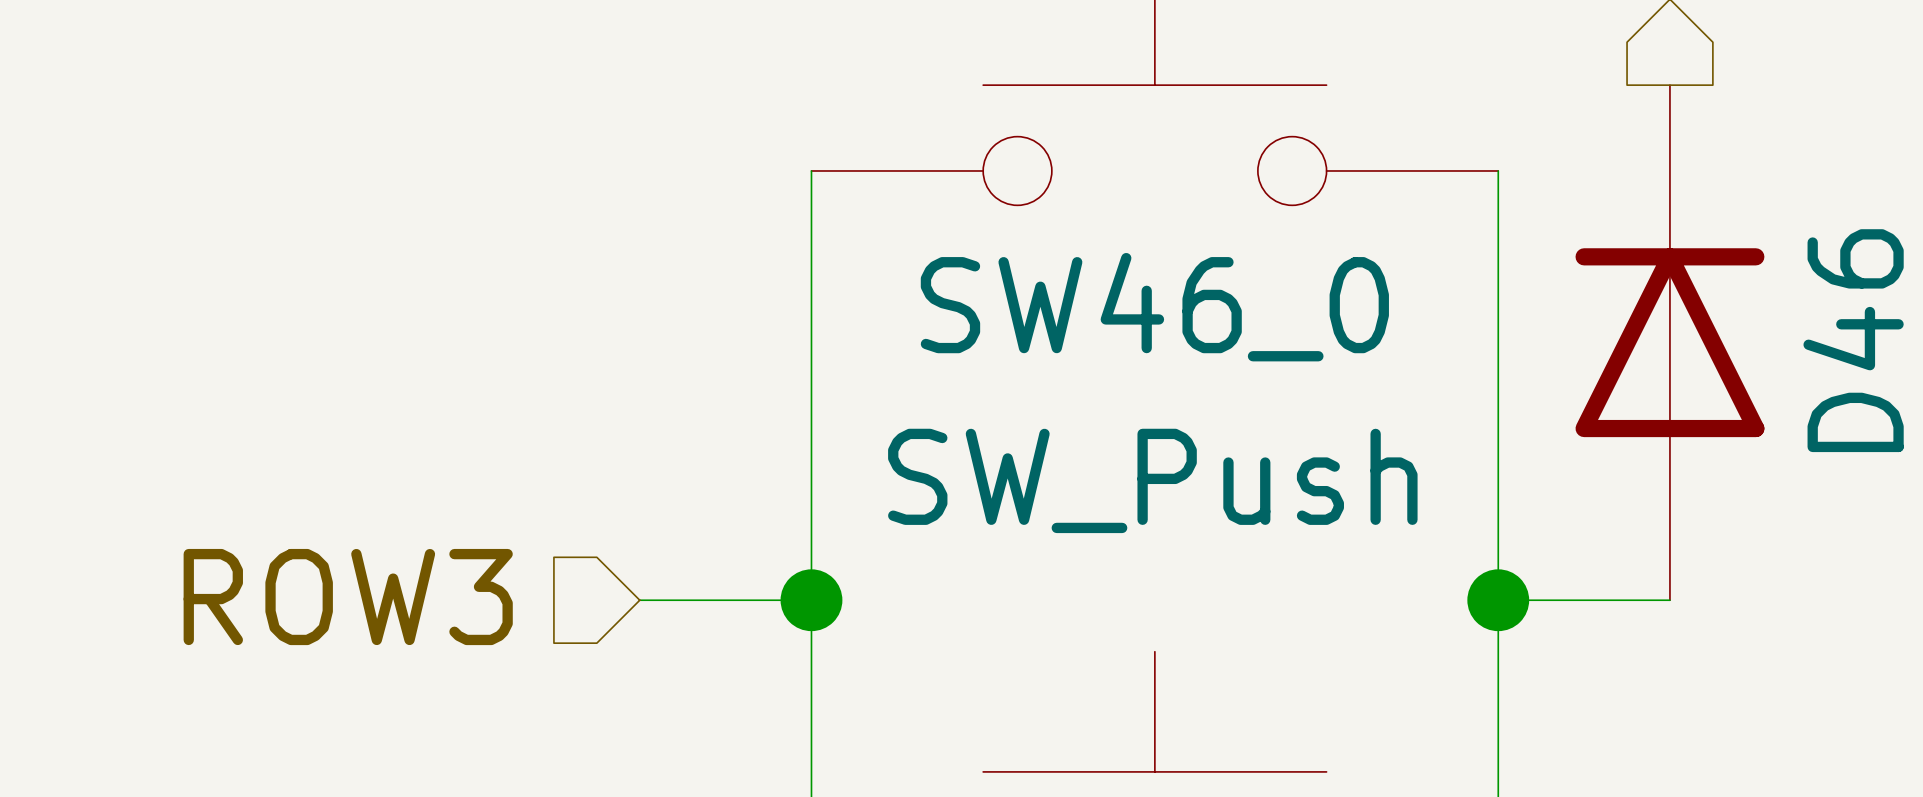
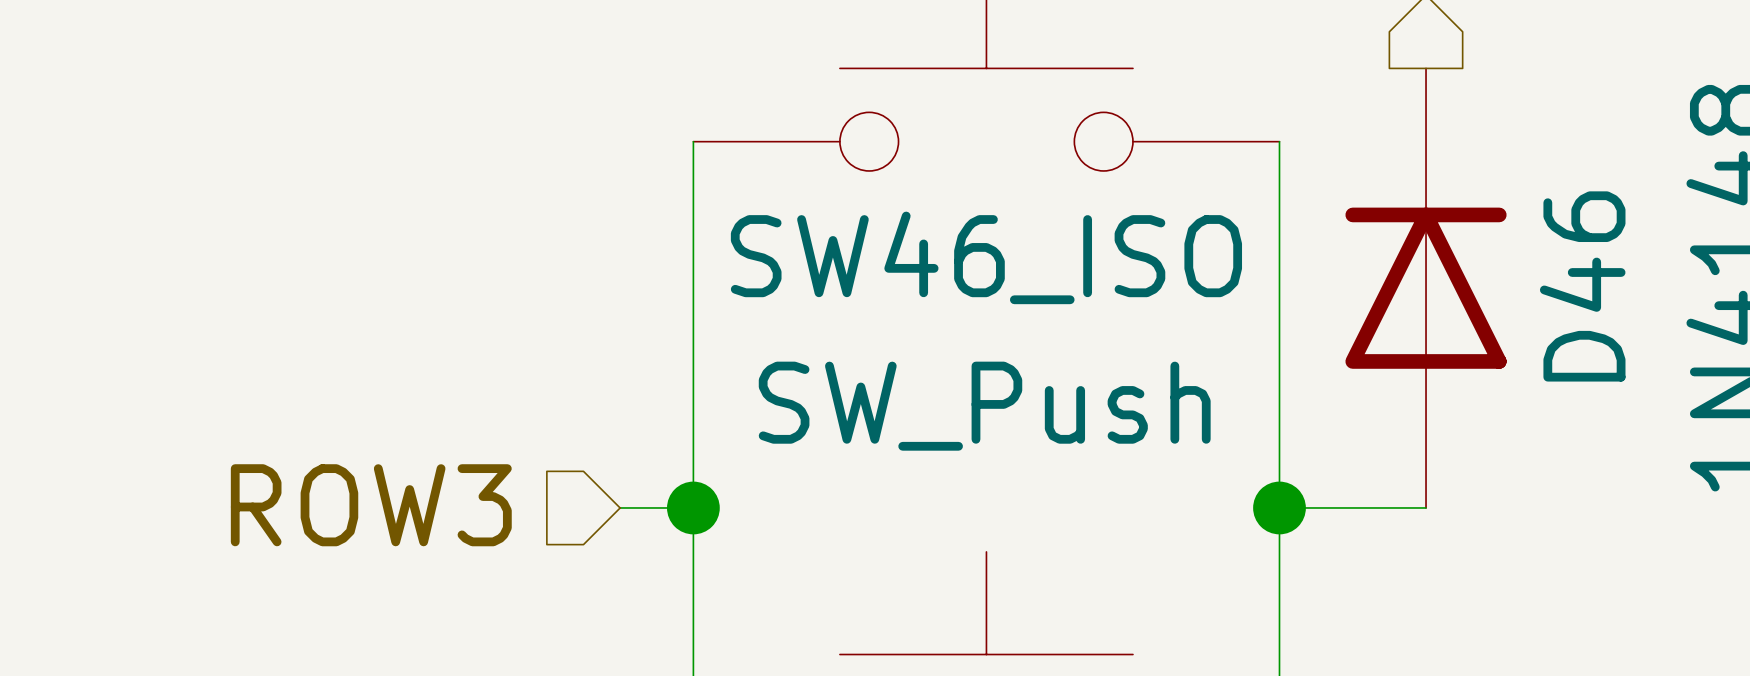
SW46_0 name: SW46_0 (1154, 307) -> SW46_ISO (986, 257)
hierarchical label position: ROW3 (348, 597) -> ROW3 (371, 505)
wire: (639, 600) (725, 600) -> none

